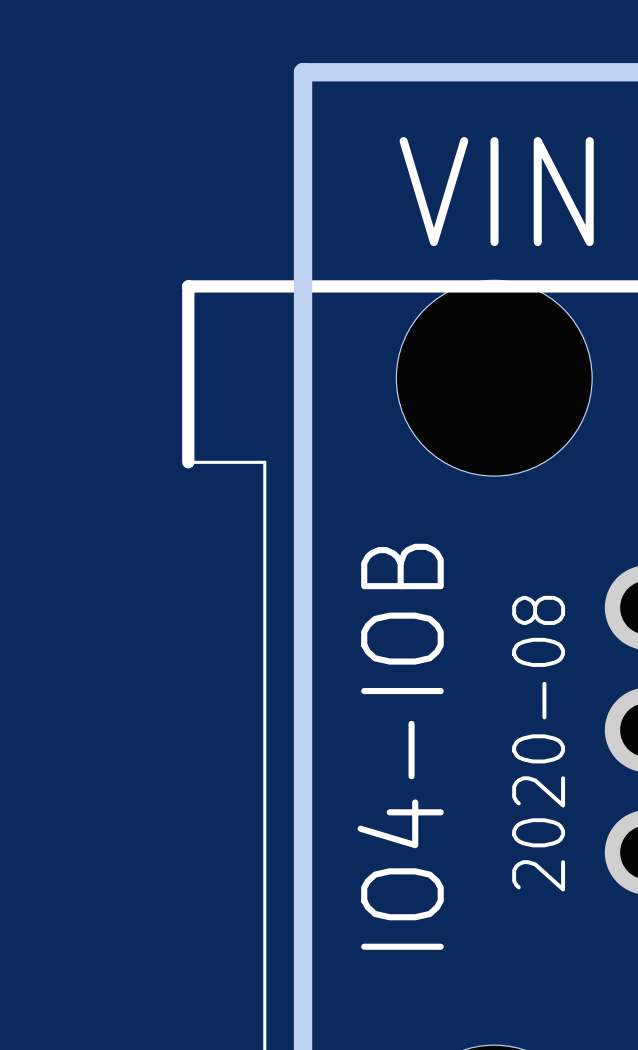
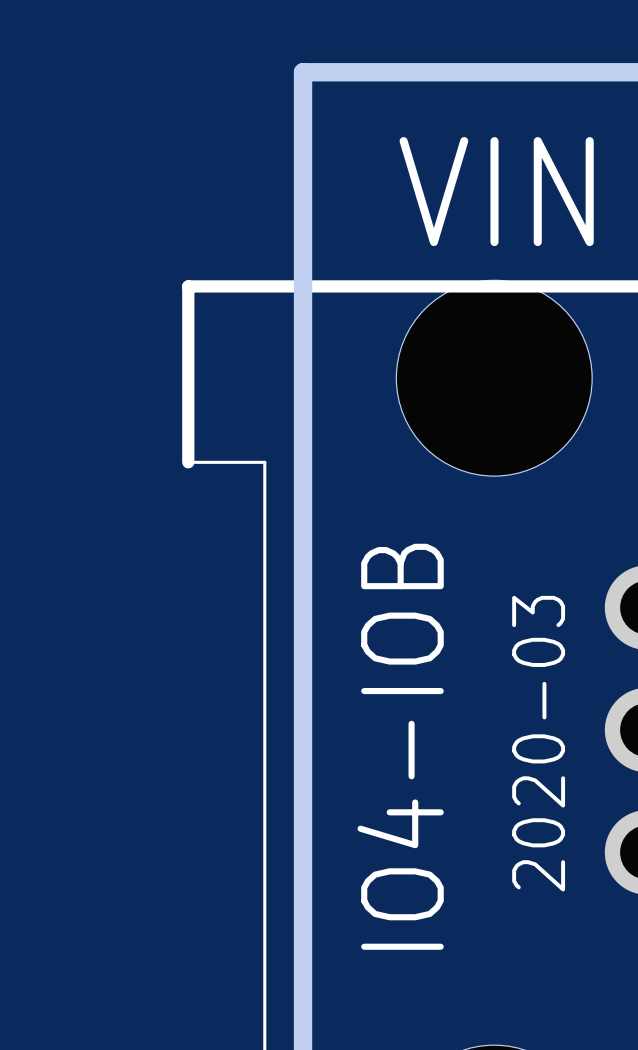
text: 2020-08 (538, 743) -> 2020-03 (538, 743)

